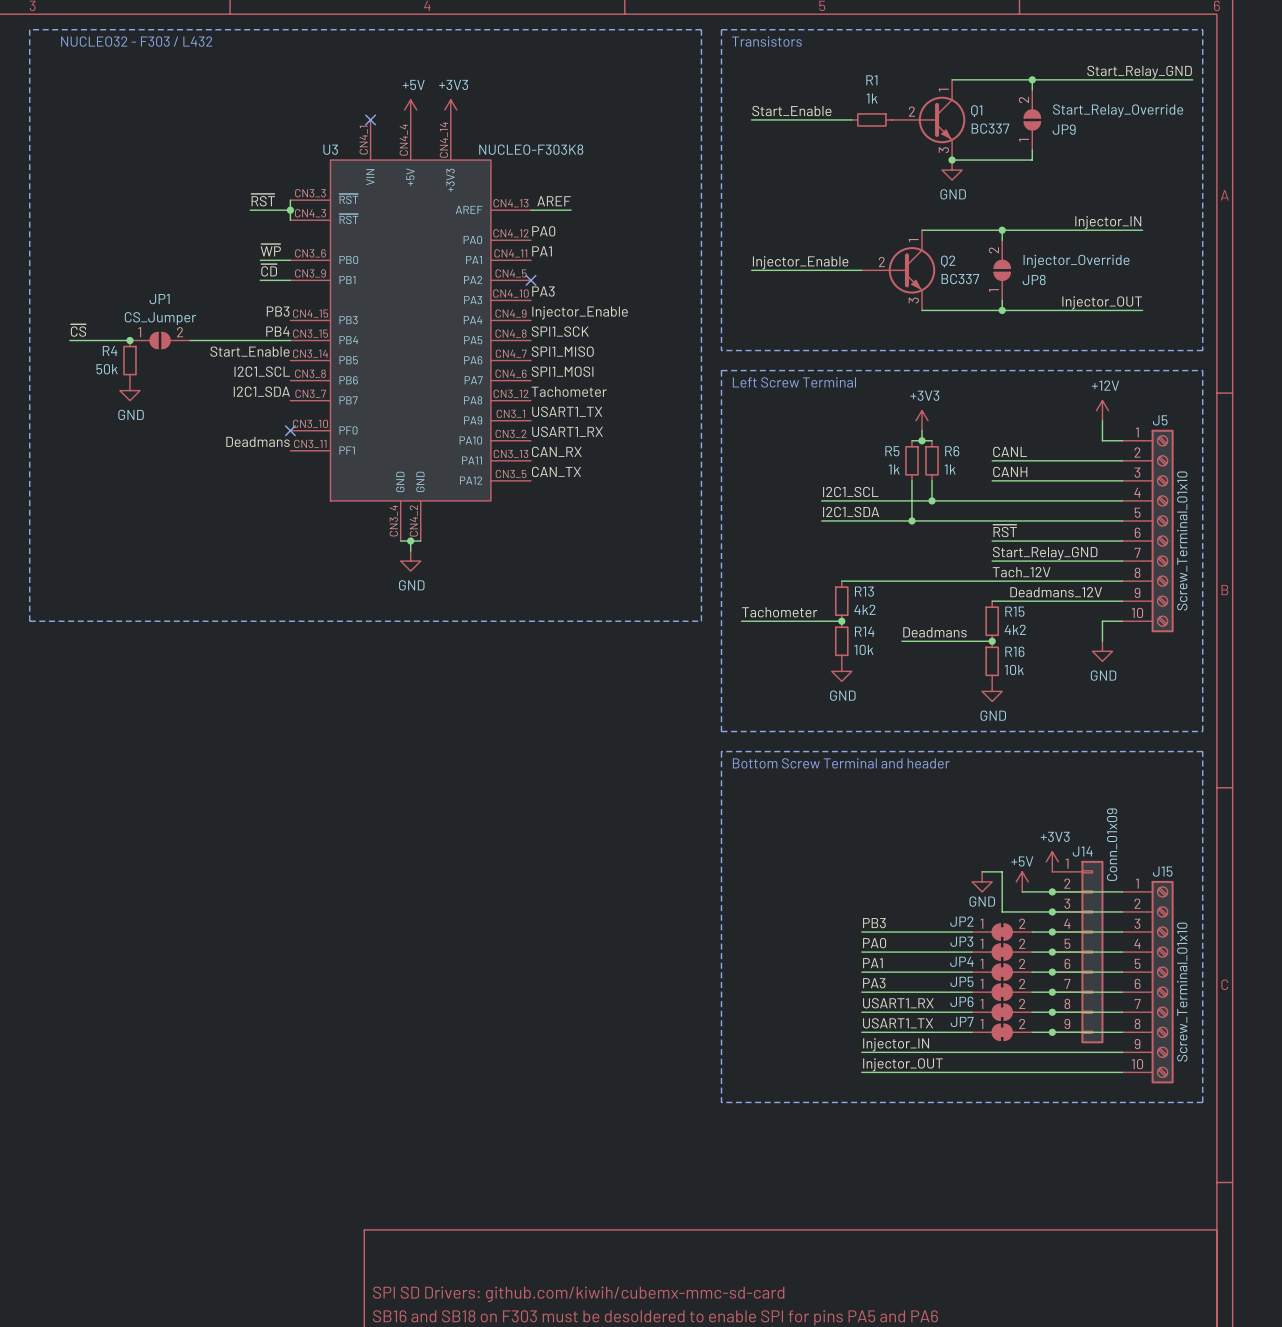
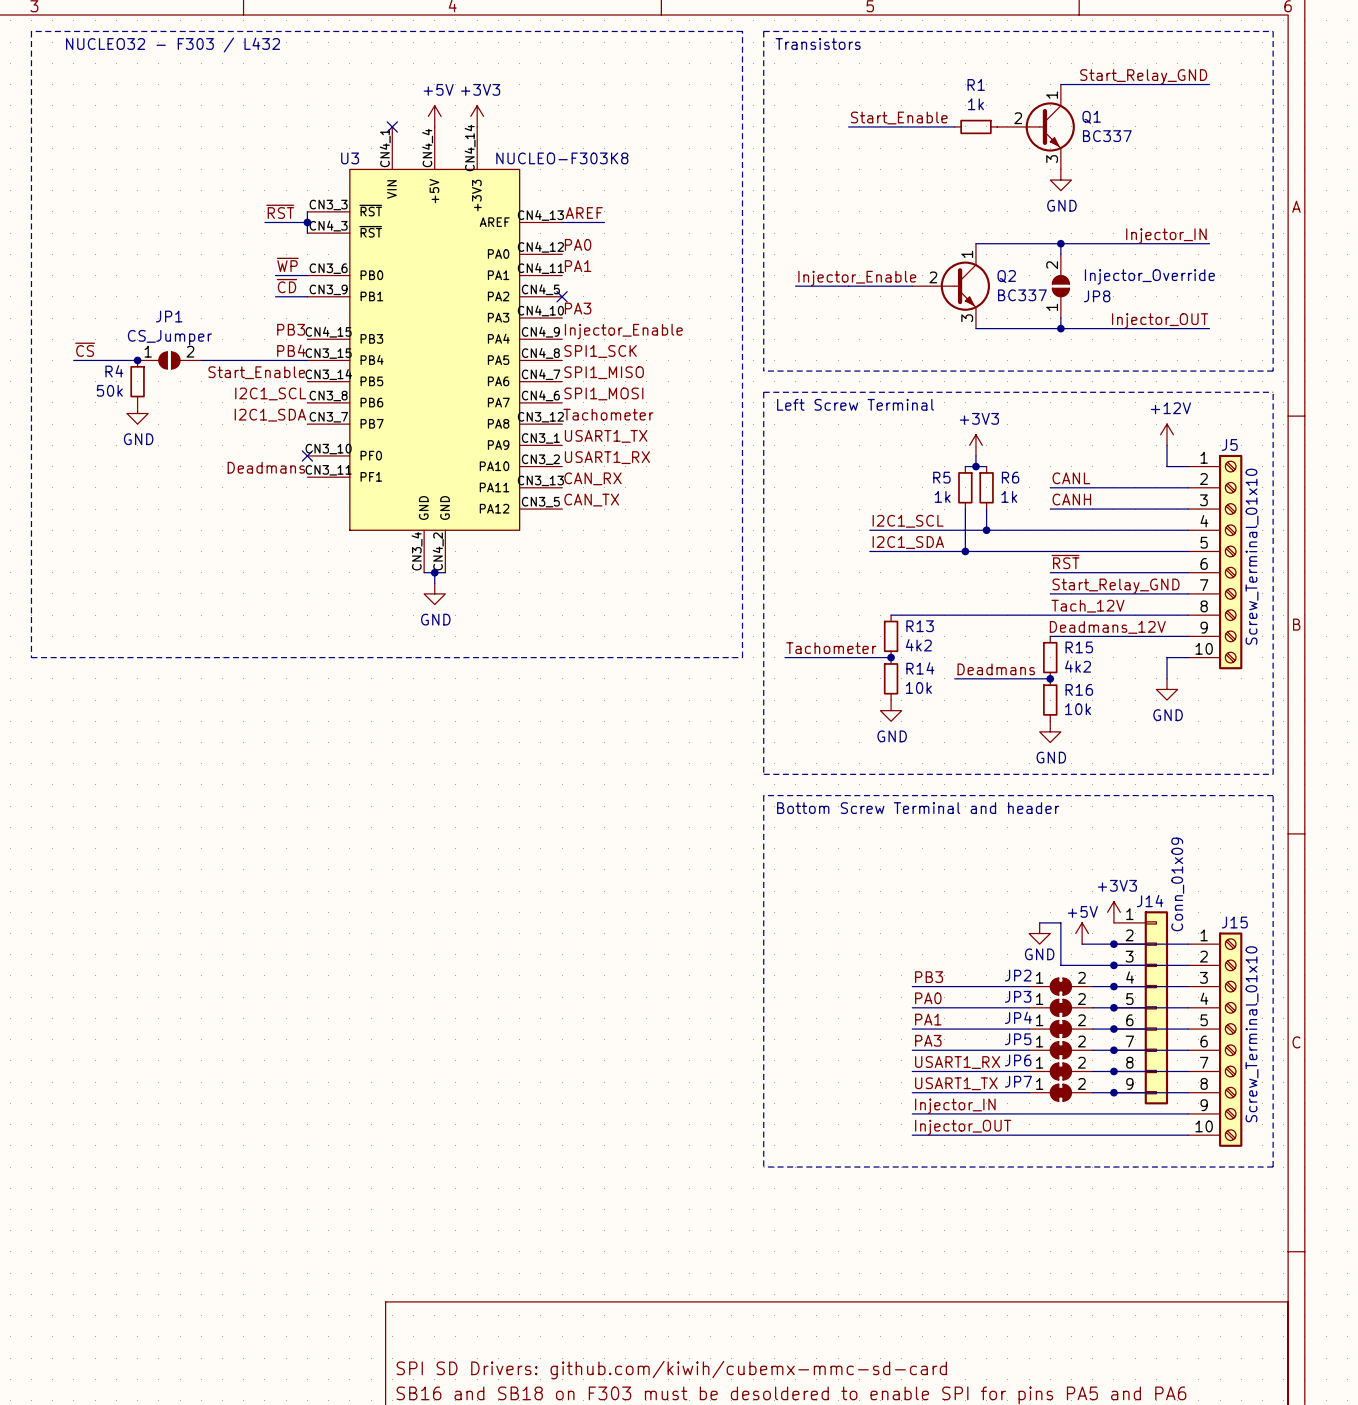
label position: Start_Relay_GND (1139, 72) -> Start_Relay_GND (1143, 76)
wire: (952, 79) (1002, 79) -> none
wire: (1032, 79) (1032, 89) -> none
junction: (1032, 79) -> none
wire: (1142, 79) (1192, 79) -> none
label position: Start_Enable (791, 111) -> Start_Enable (899, 118)
wire: (751, 119) (801, 119) -> (901, 126) (954, 126)
R1 position: (871, 119) -> (975, 126)
Q1 position: (928, 119) -> (1036, 126)
JP9: Start_Relay_Override (1032, 119) -> none
wire: (1032, 150) (1032, 160) (952, 160) -> none
junction: (952, 160) -> none
power symbol position: GND (952, 170) -> GND (1060, 180)

